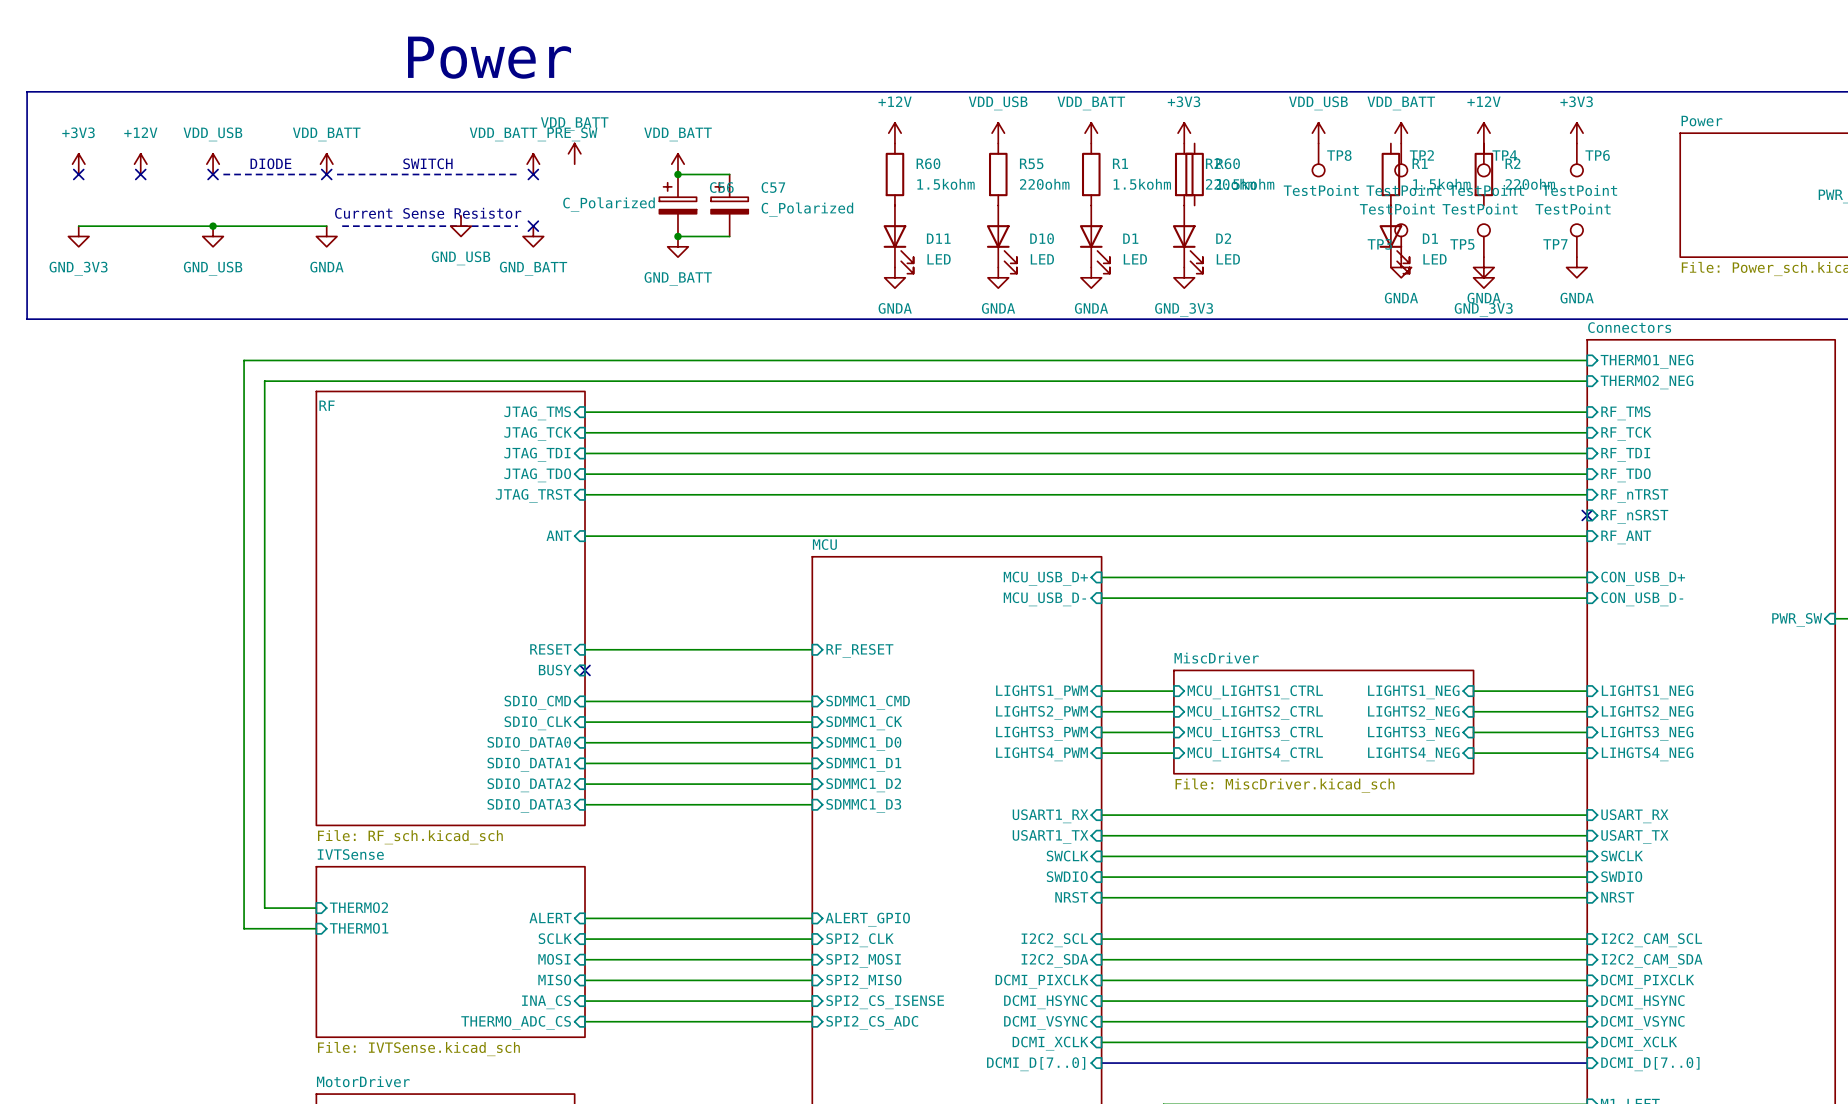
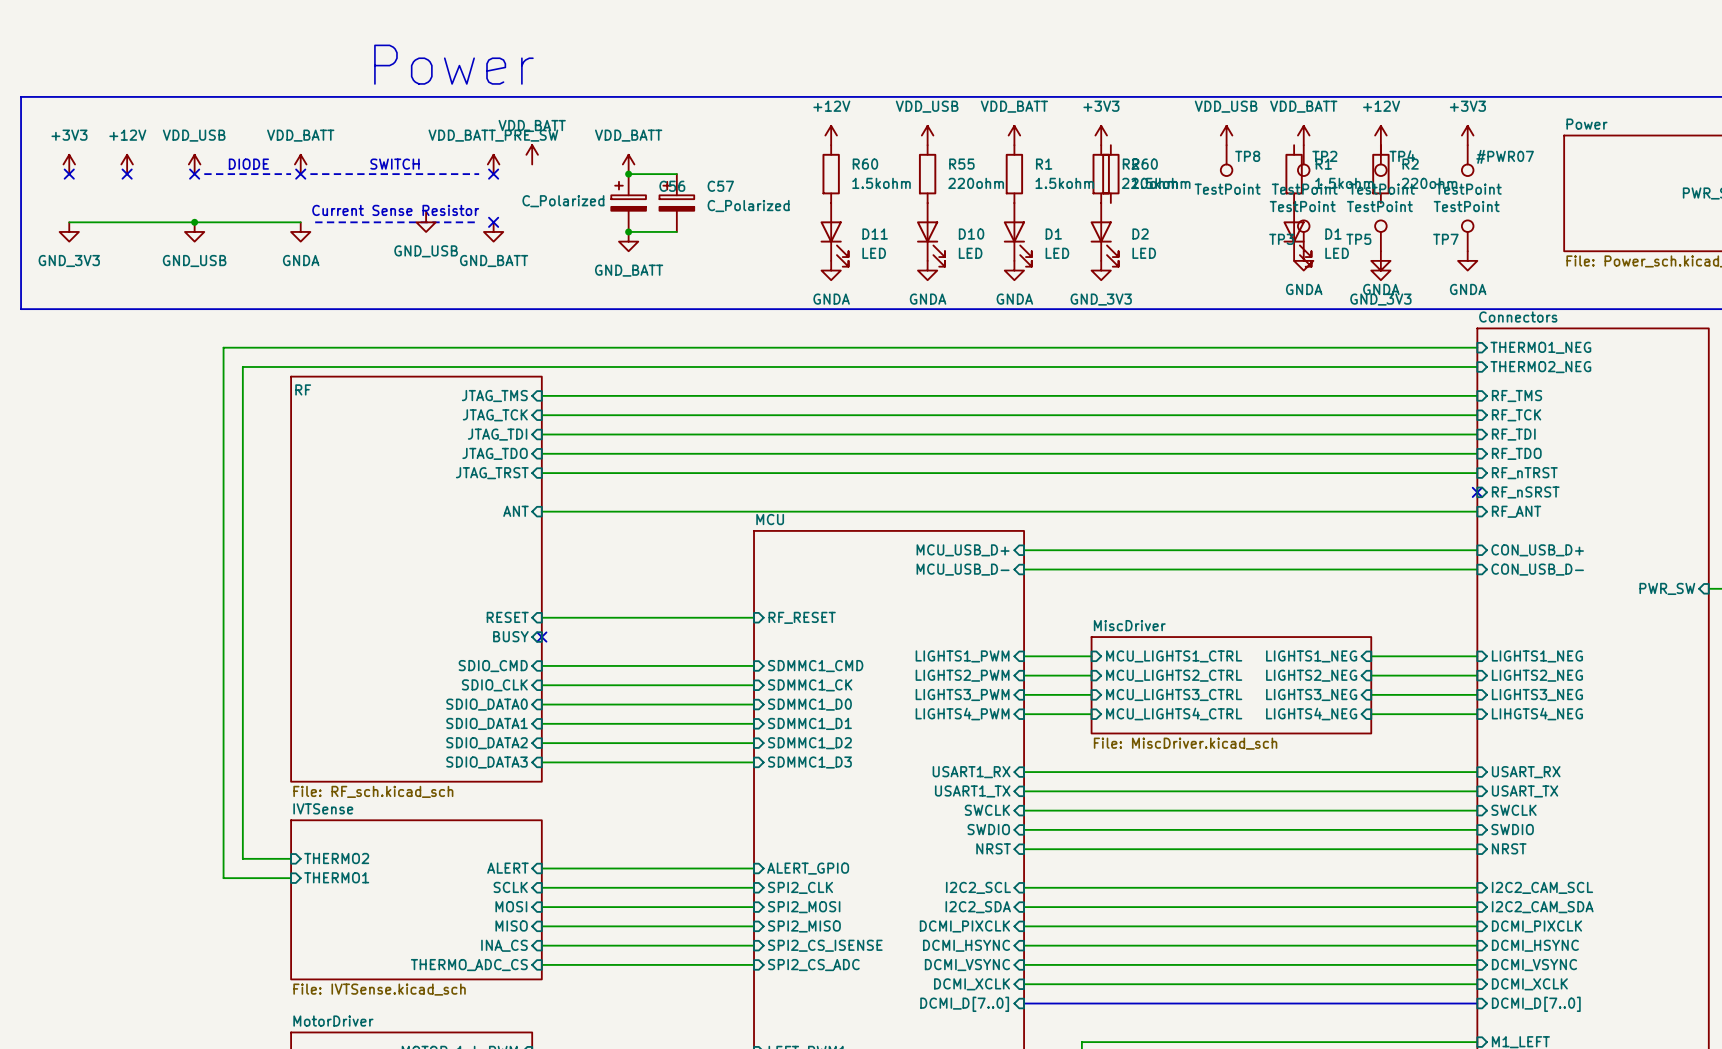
TP6: TestPoint (1576, 160) -> none
#PWR07: none -> TestPoint (1467, 160)

